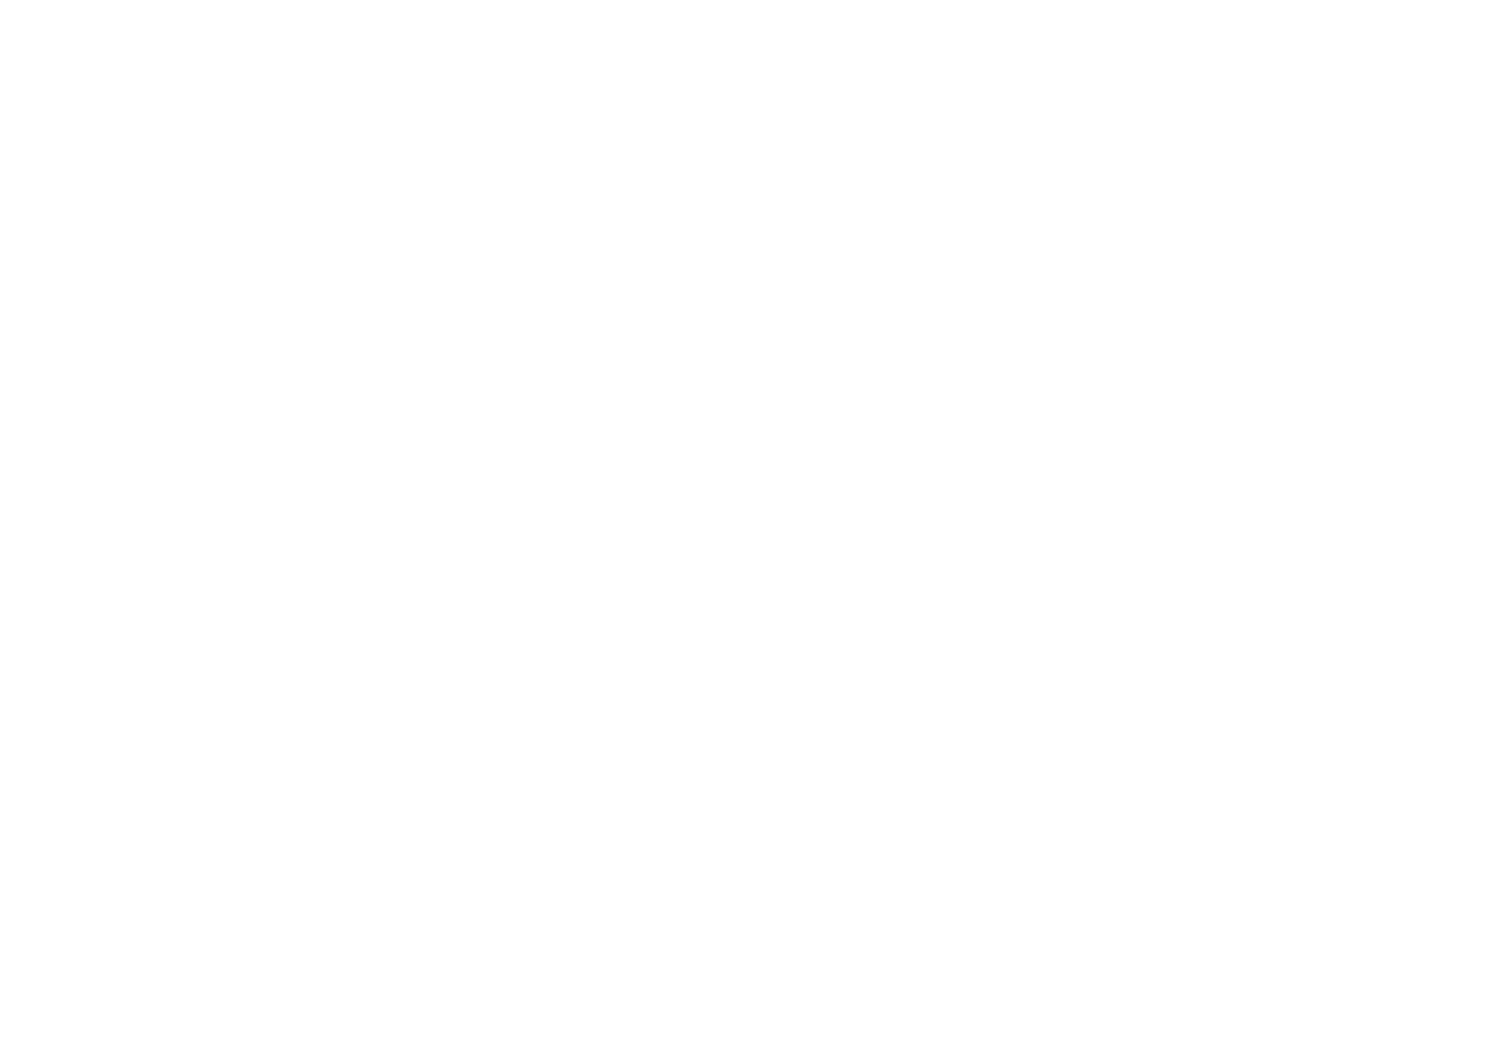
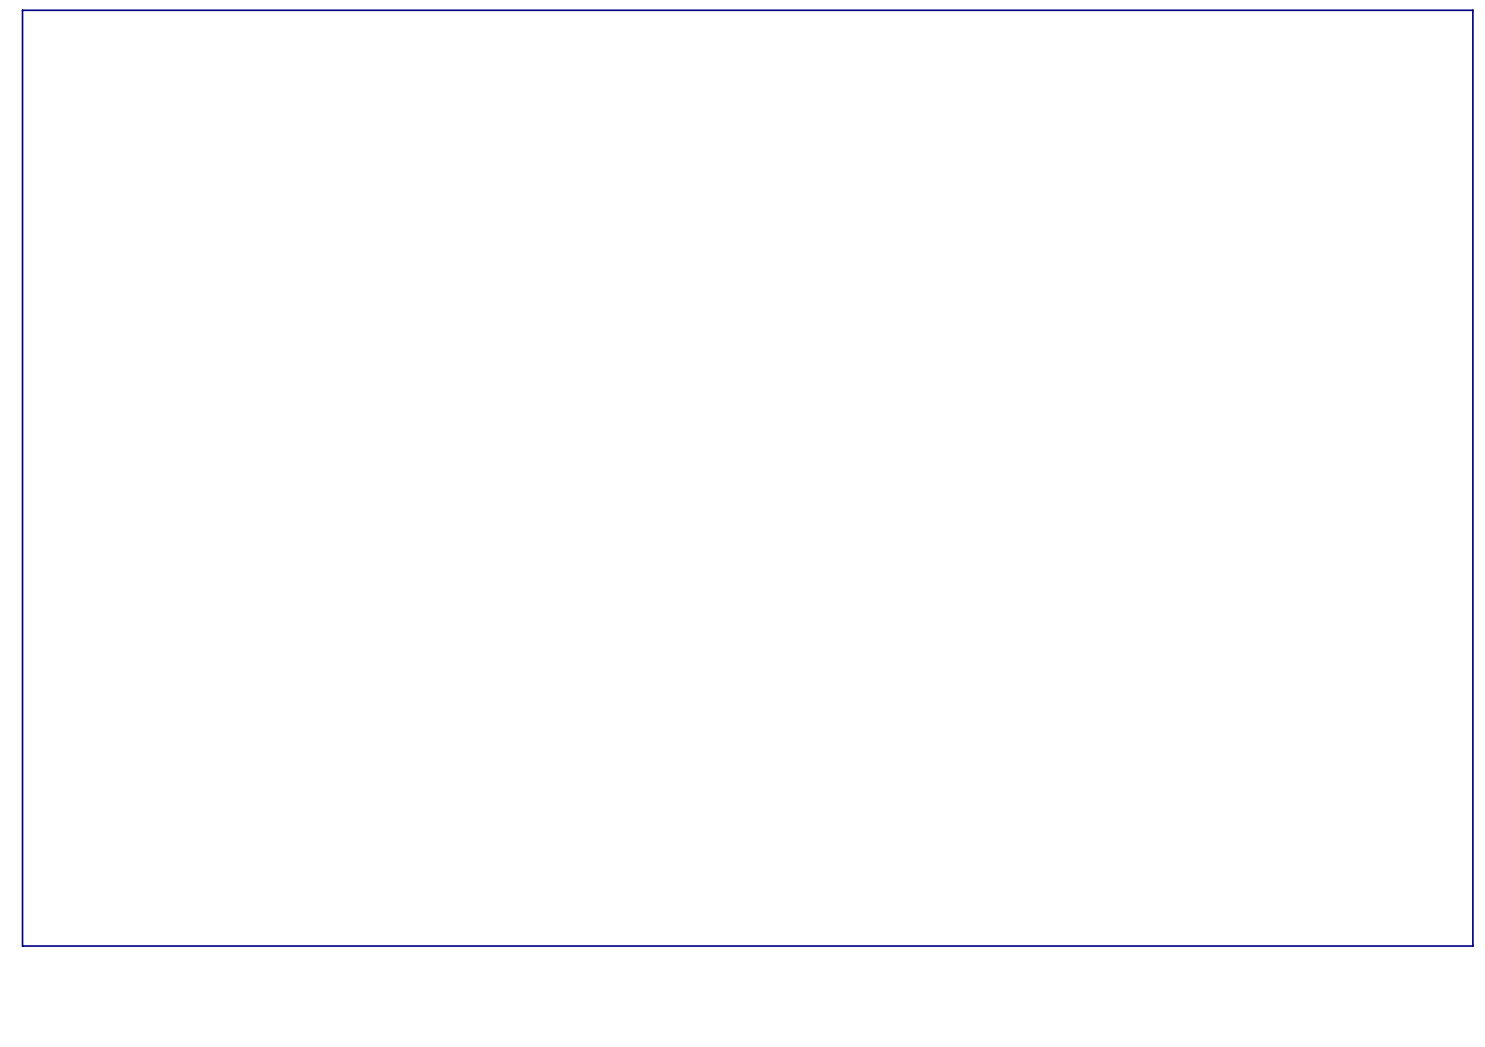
bus: none -> (22, 10) (22, 946) (1472, 946) (1472, 10) (22, 10)

